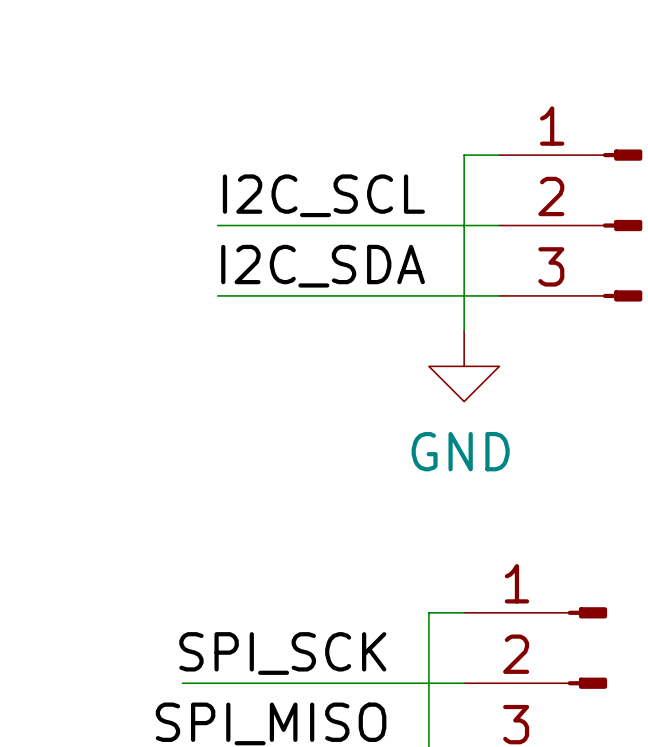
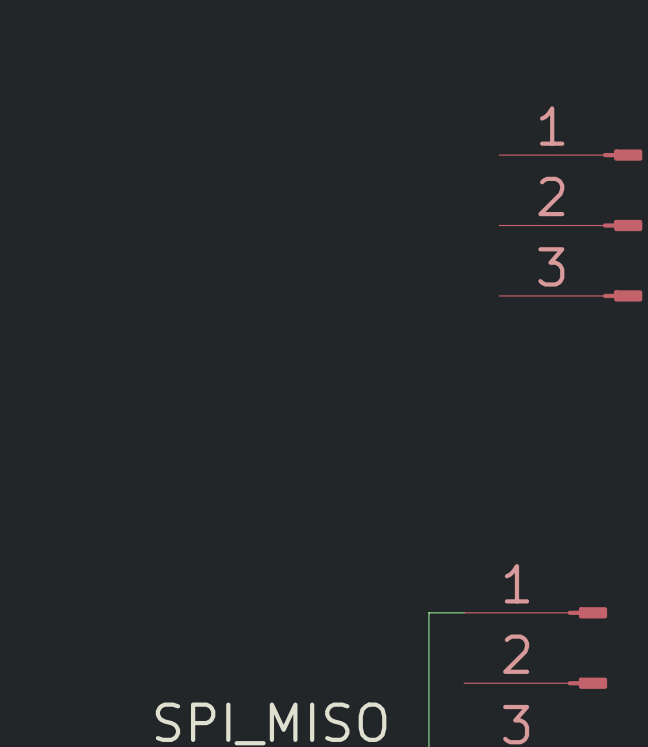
wire: (499, 155) (464, 155) (464, 331) -> none
label: I2C_SCL (323, 195) -> none
wire: (217, 225) (499, 225) -> none
label: I2C_SDA (323, 266) -> none
wire: (217, 295) (499, 295) -> none
power symbol: GND (464, 366) -> none
label: SPI_SCK (282, 653) -> none
wire: (182, 683) (464, 683) -> none

